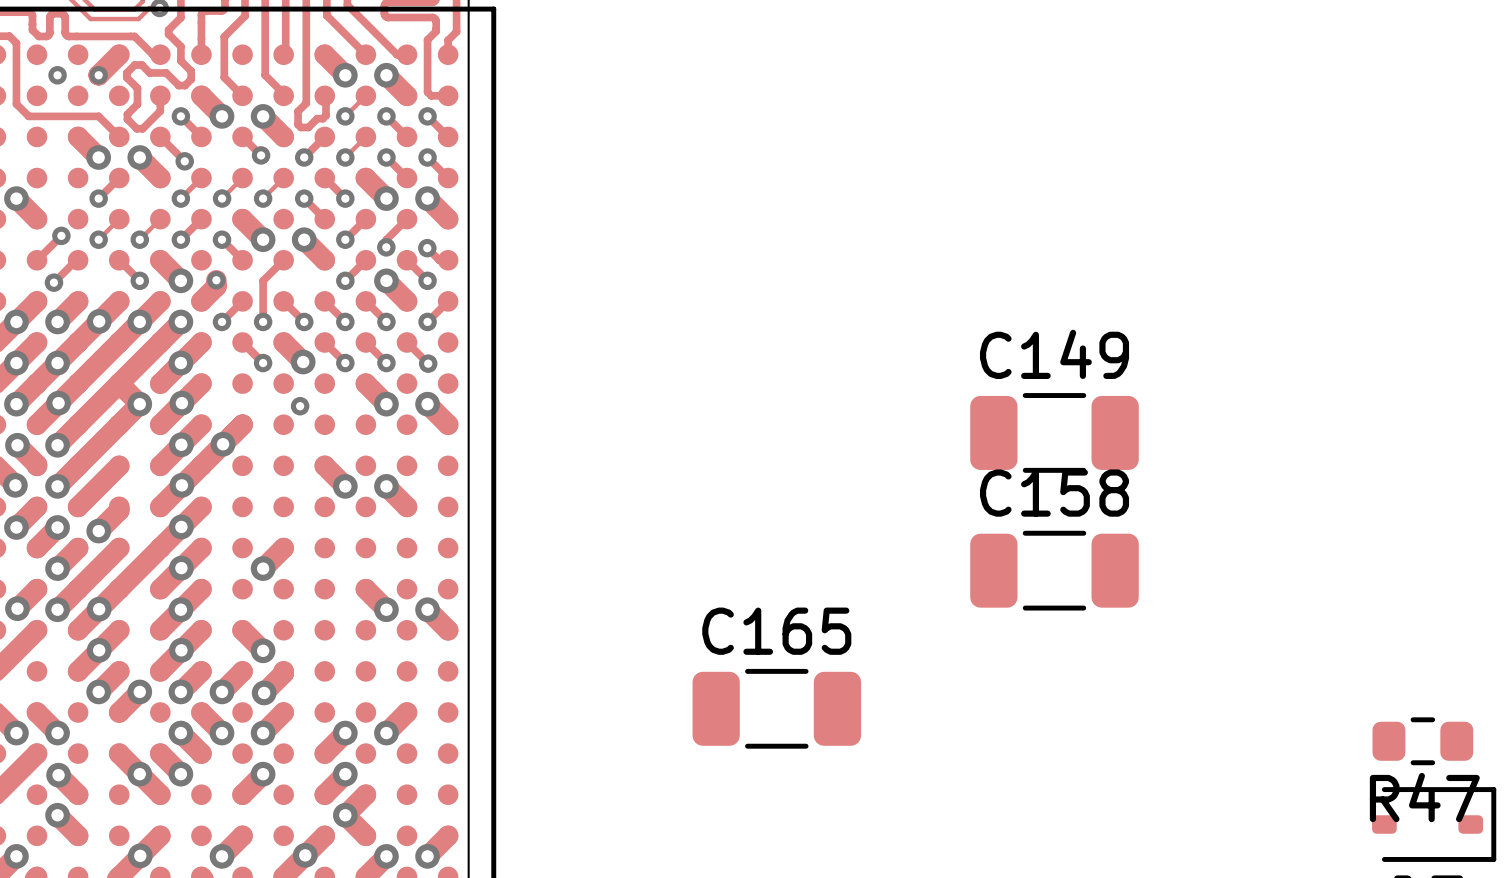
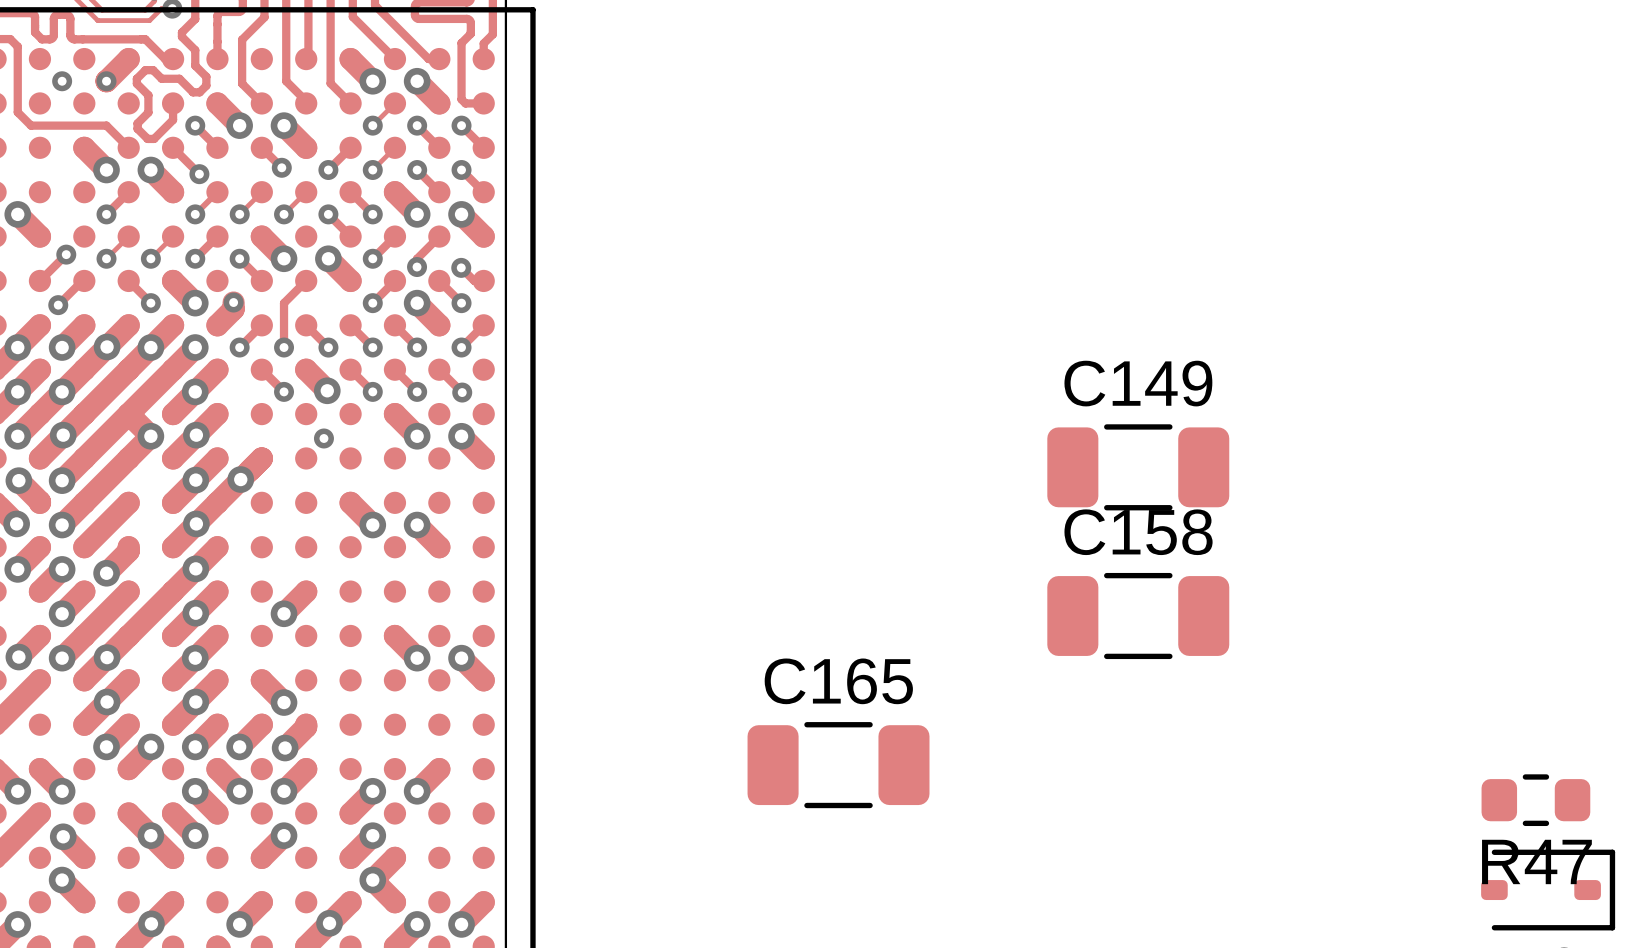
track: (306, 77) (306, 103) (298, 111) (298, 124) (300, 127) (308, 127) (317, 118) (322, 118) (326, 115) (324, 95) -> (330, 83) (350, 103)

